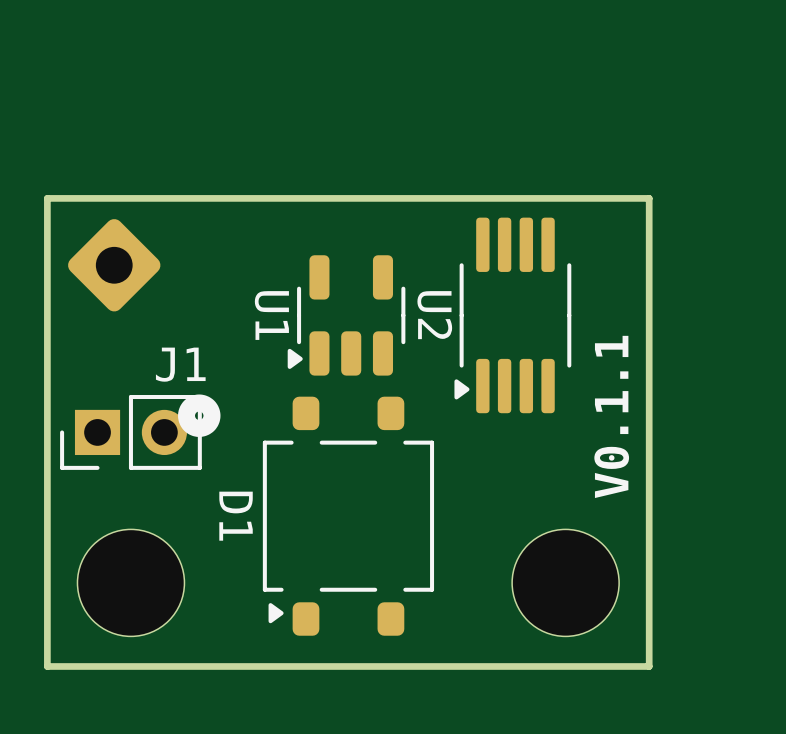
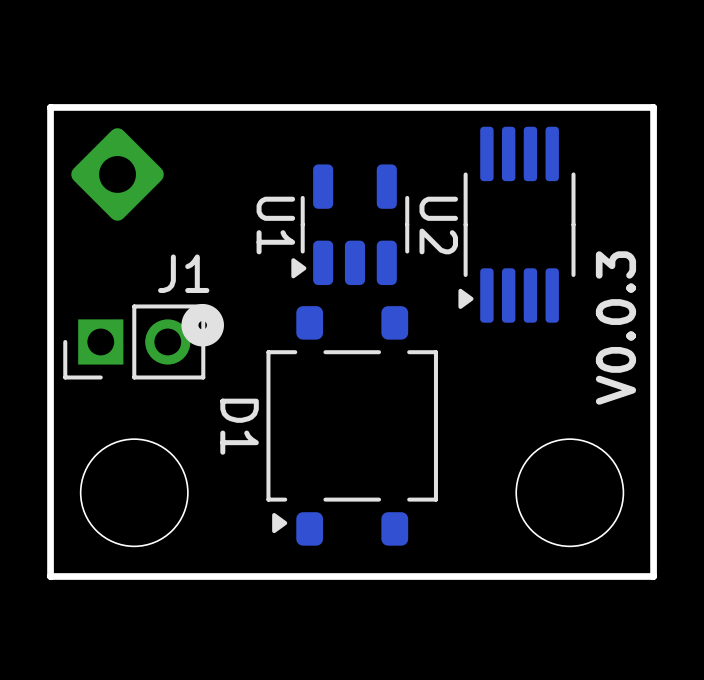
text: V0.1.1 (611, 416) -> V0.0.3 (615, 328)

